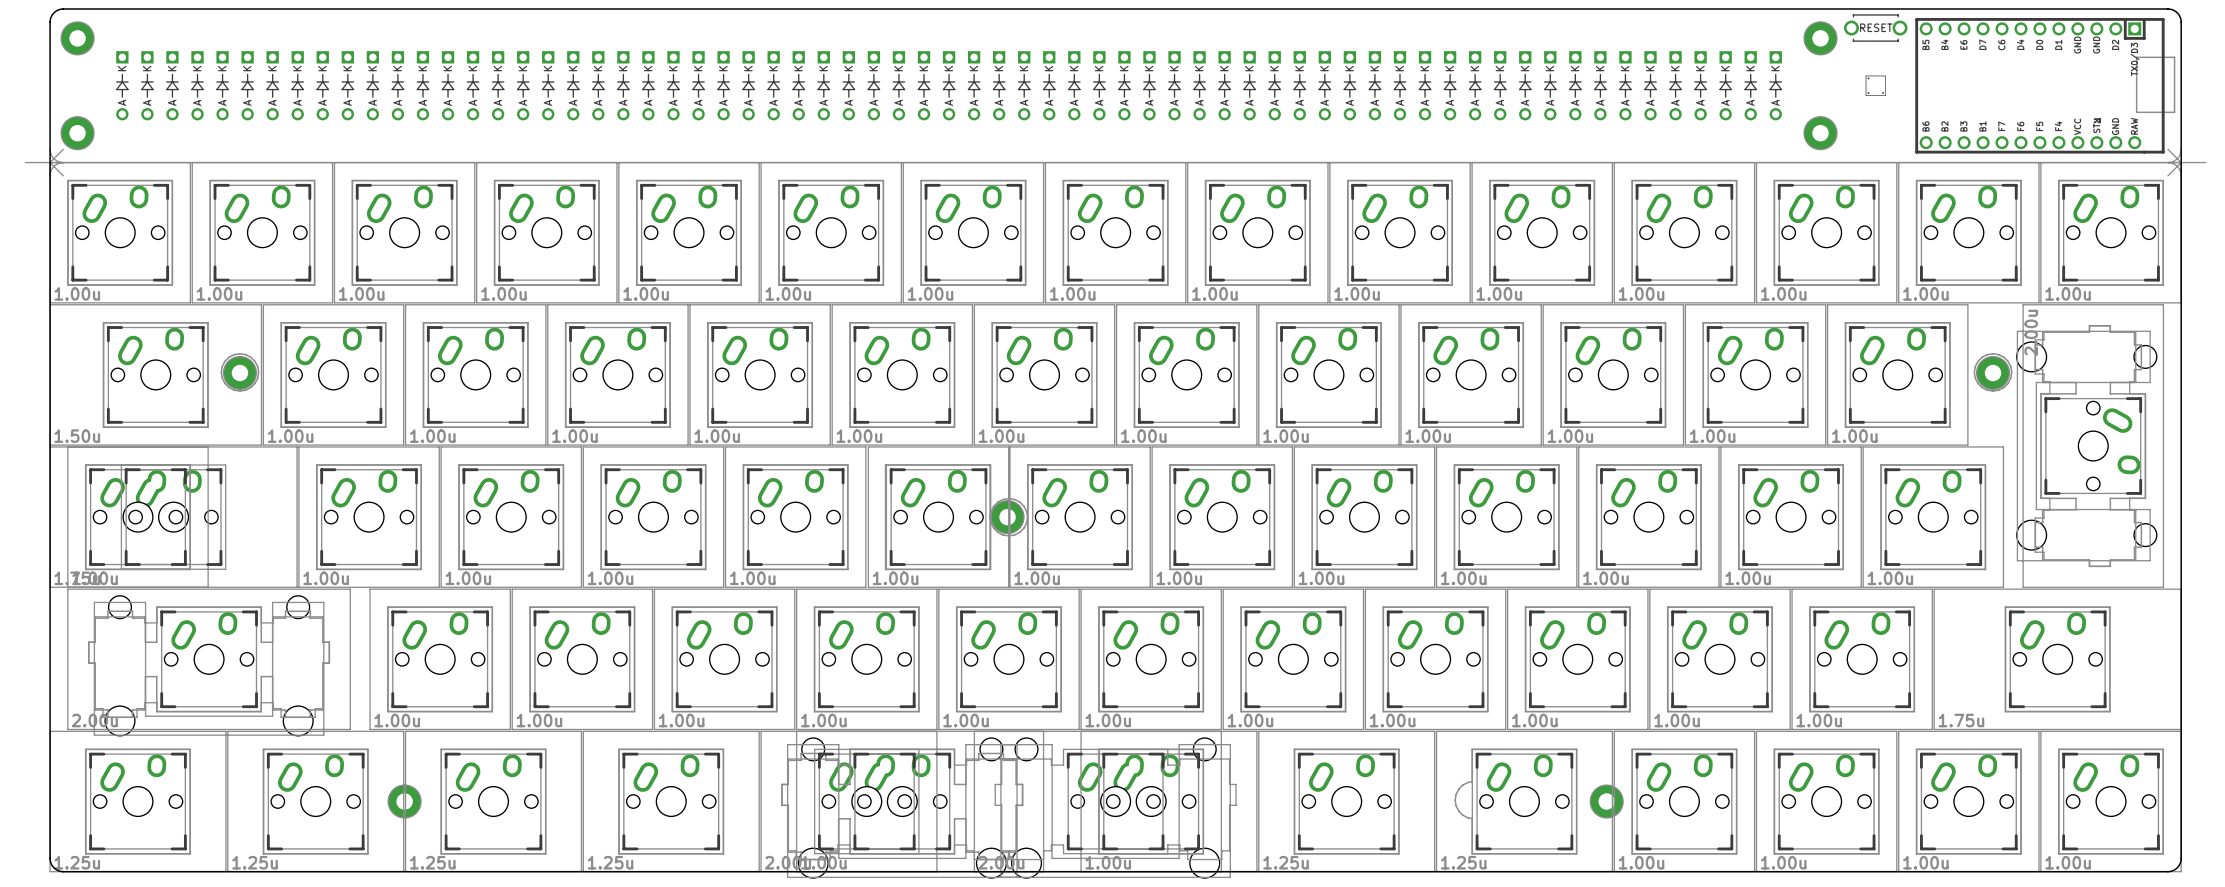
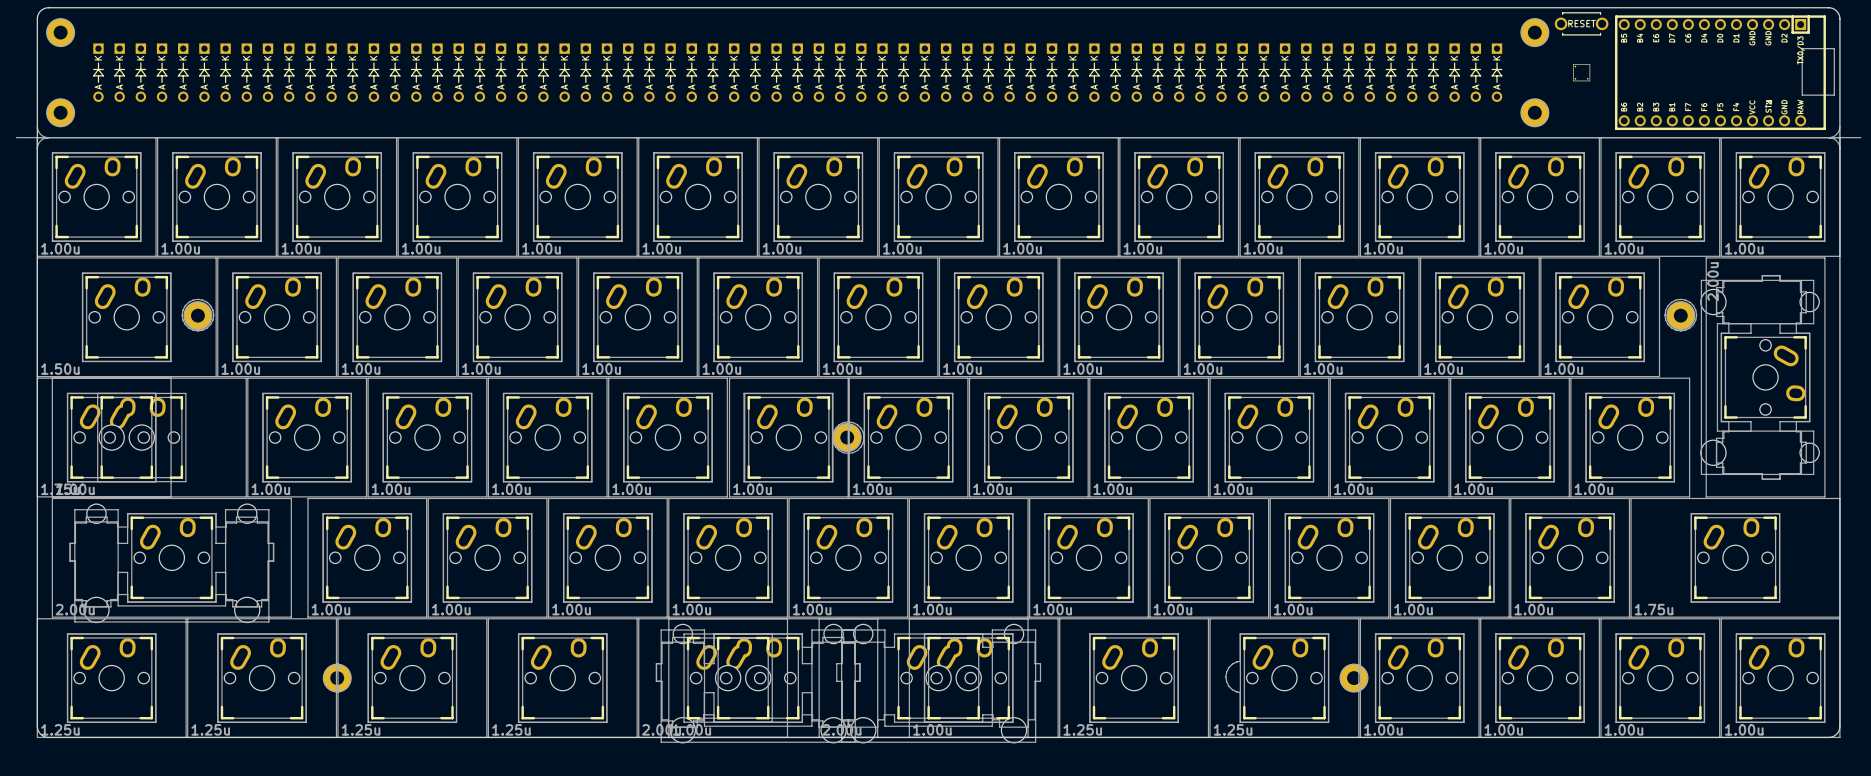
line: (63, 149) (50, 162) (63, 175) -> none
line: (2167, 149) (2181, 162) (2167, 175) -> none

